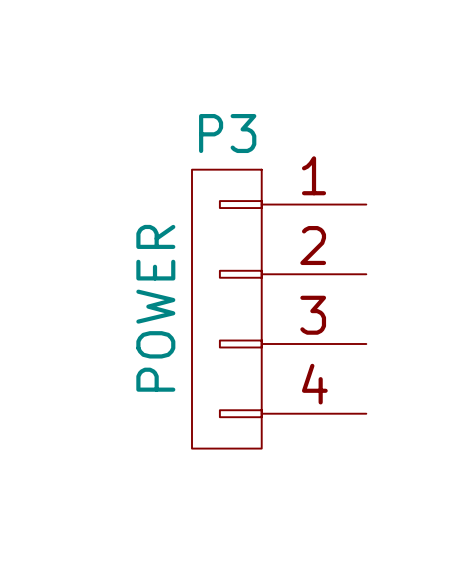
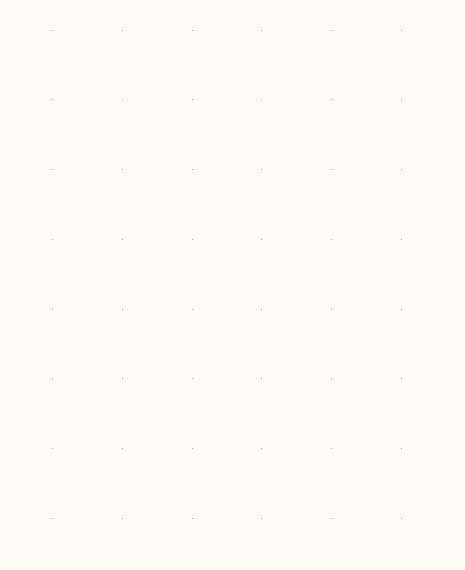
P3: POWER (279, 309) -> none

